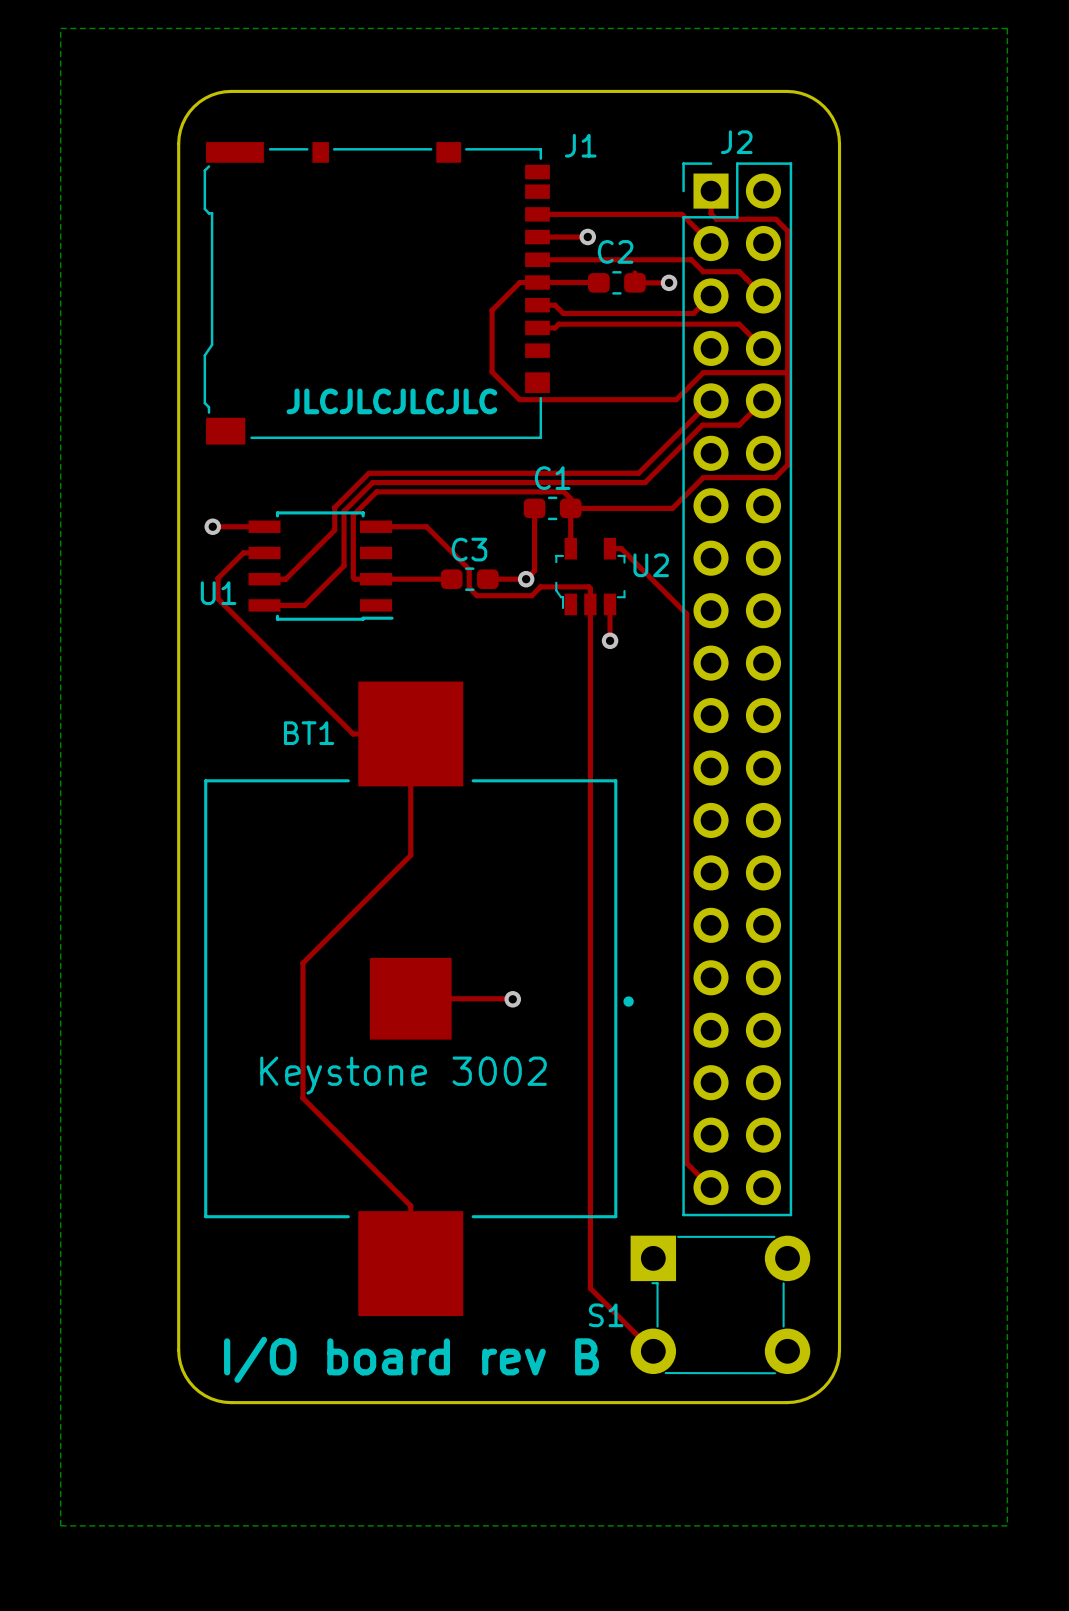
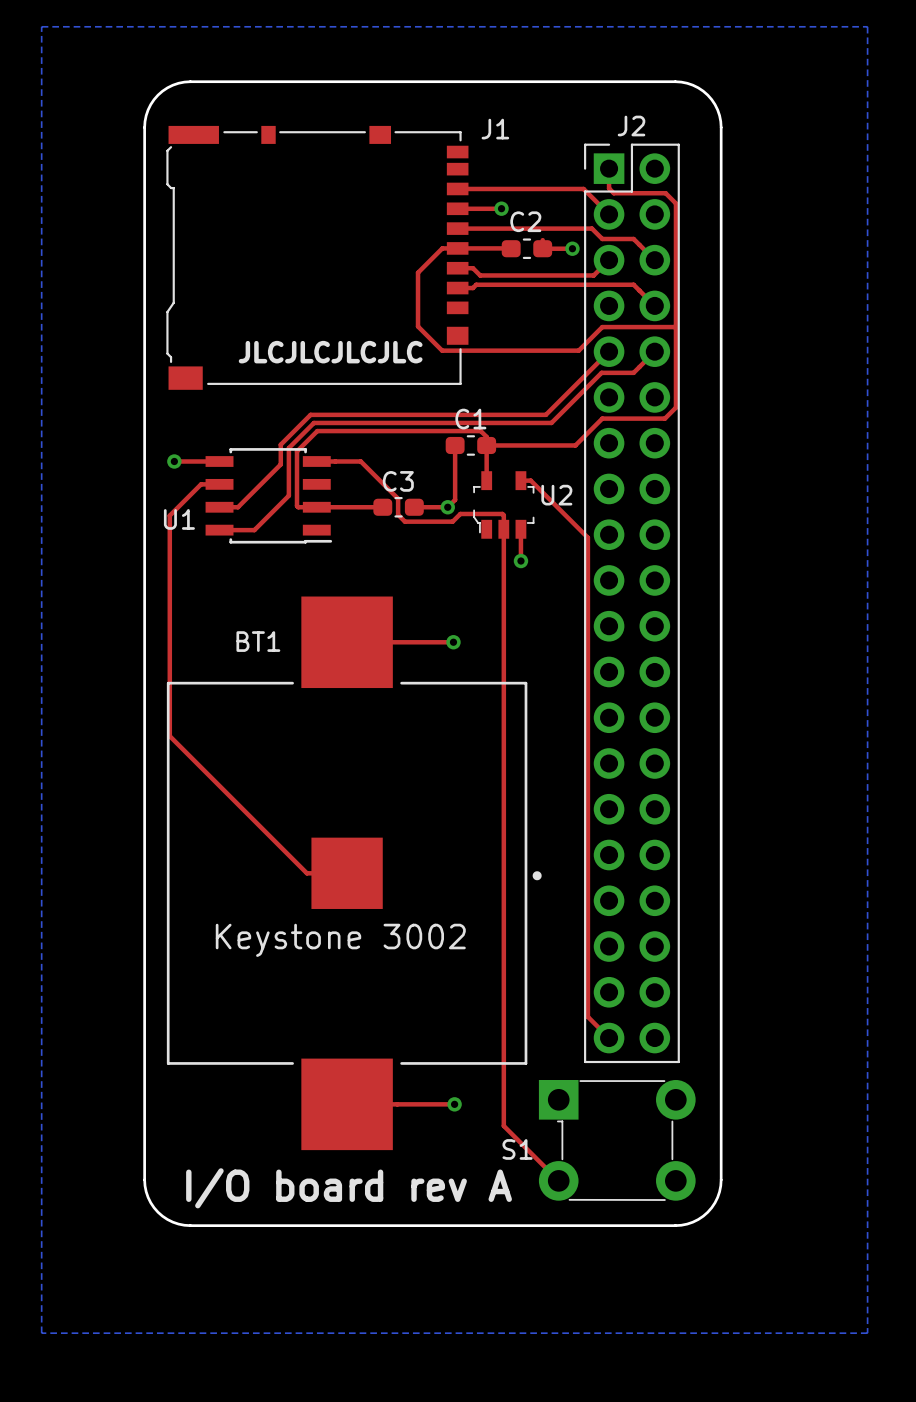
top track: (218, 578) (218, 598) (353, 733) (410, 733) (410, 855) (302, 963) (302, 1098) (410, 1205) (410, 1263) -> (178, 506) (169, 515) (169, 736) (306, 873) (347, 873)
top track: none -> (347, 642) (453, 642)
via: none -> (453, 642)
top track: (410, 998) (512, 999) -> none
via: (512, 999) -> none
top track: none -> (347, 1104) (454, 1104)
via: none -> (454, 1104)
text: I/O board rev B (411, 1359) -> I/O board rev A (349, 1188)

